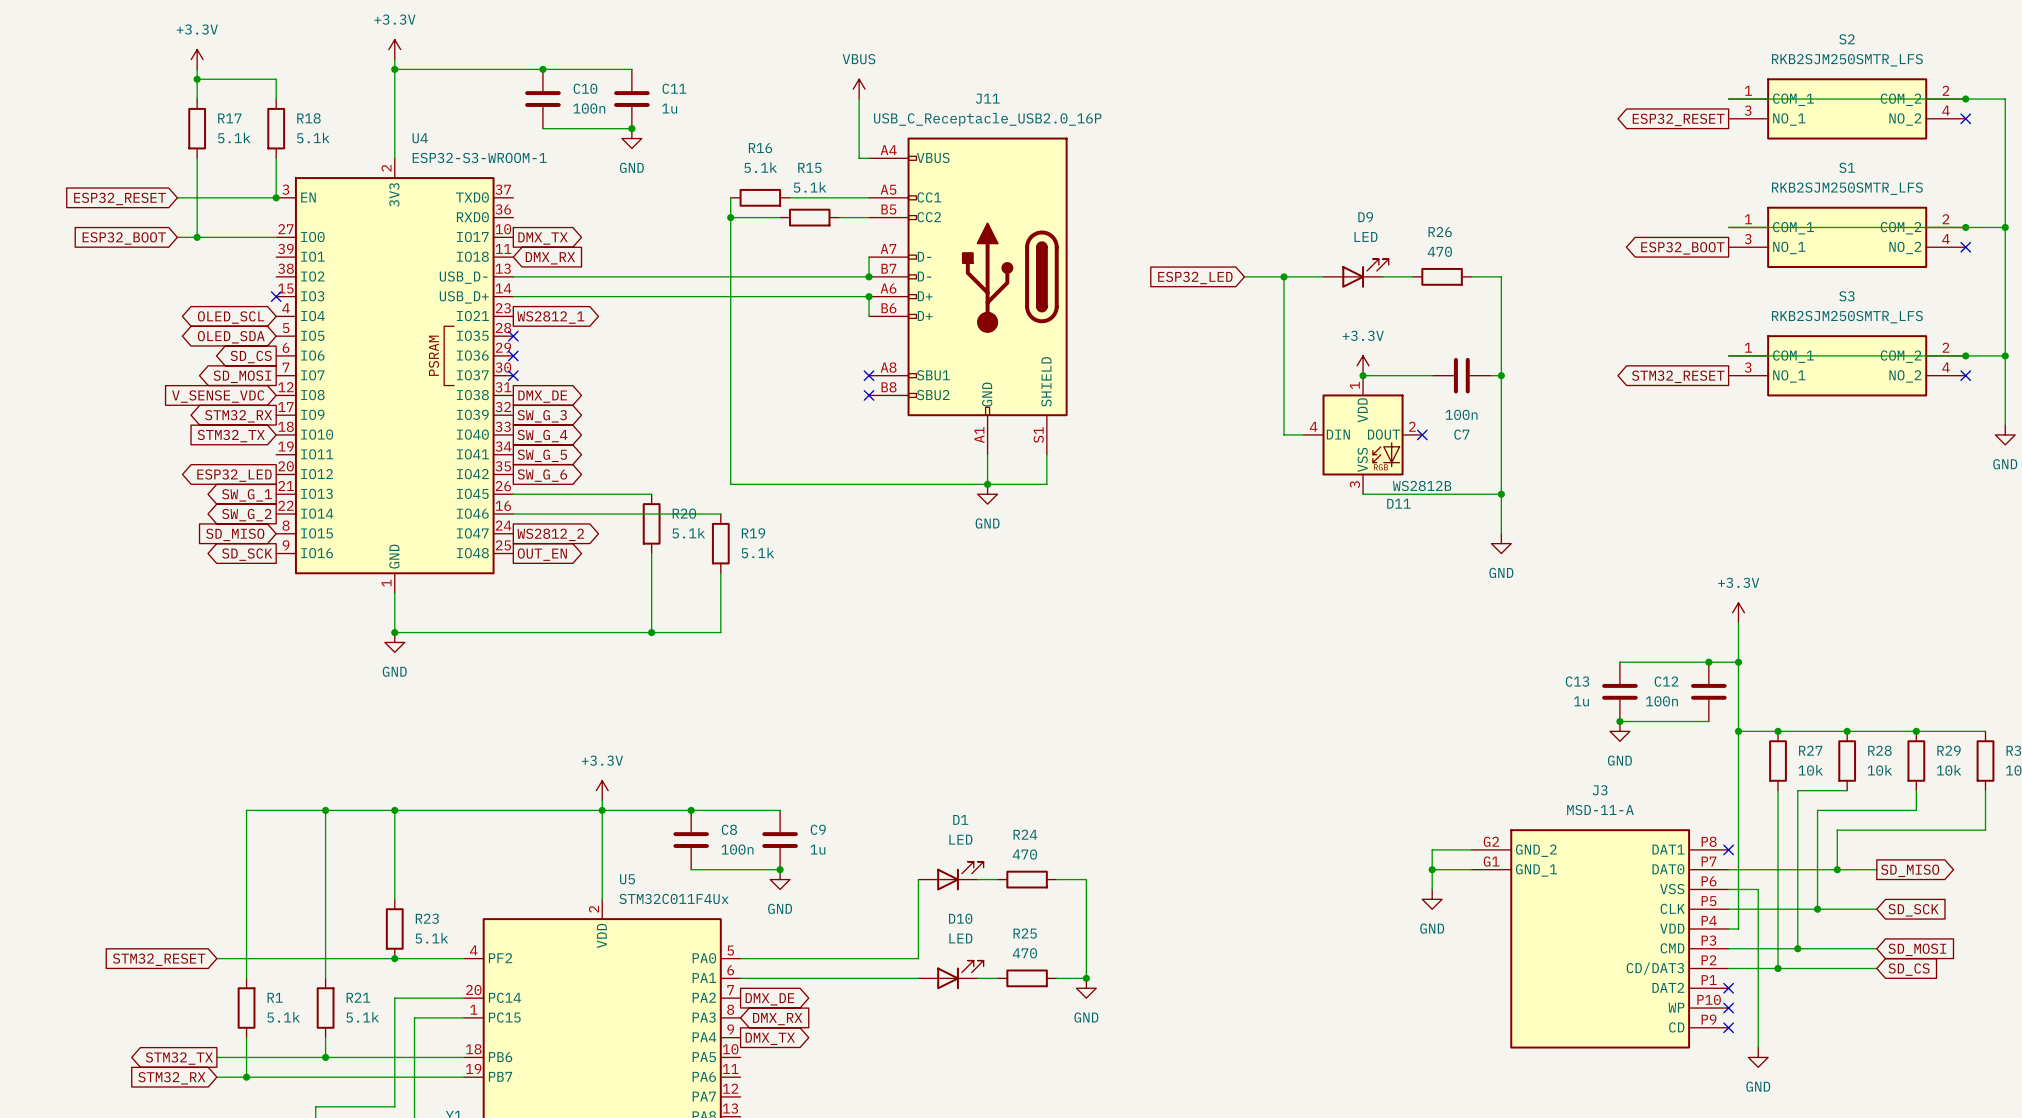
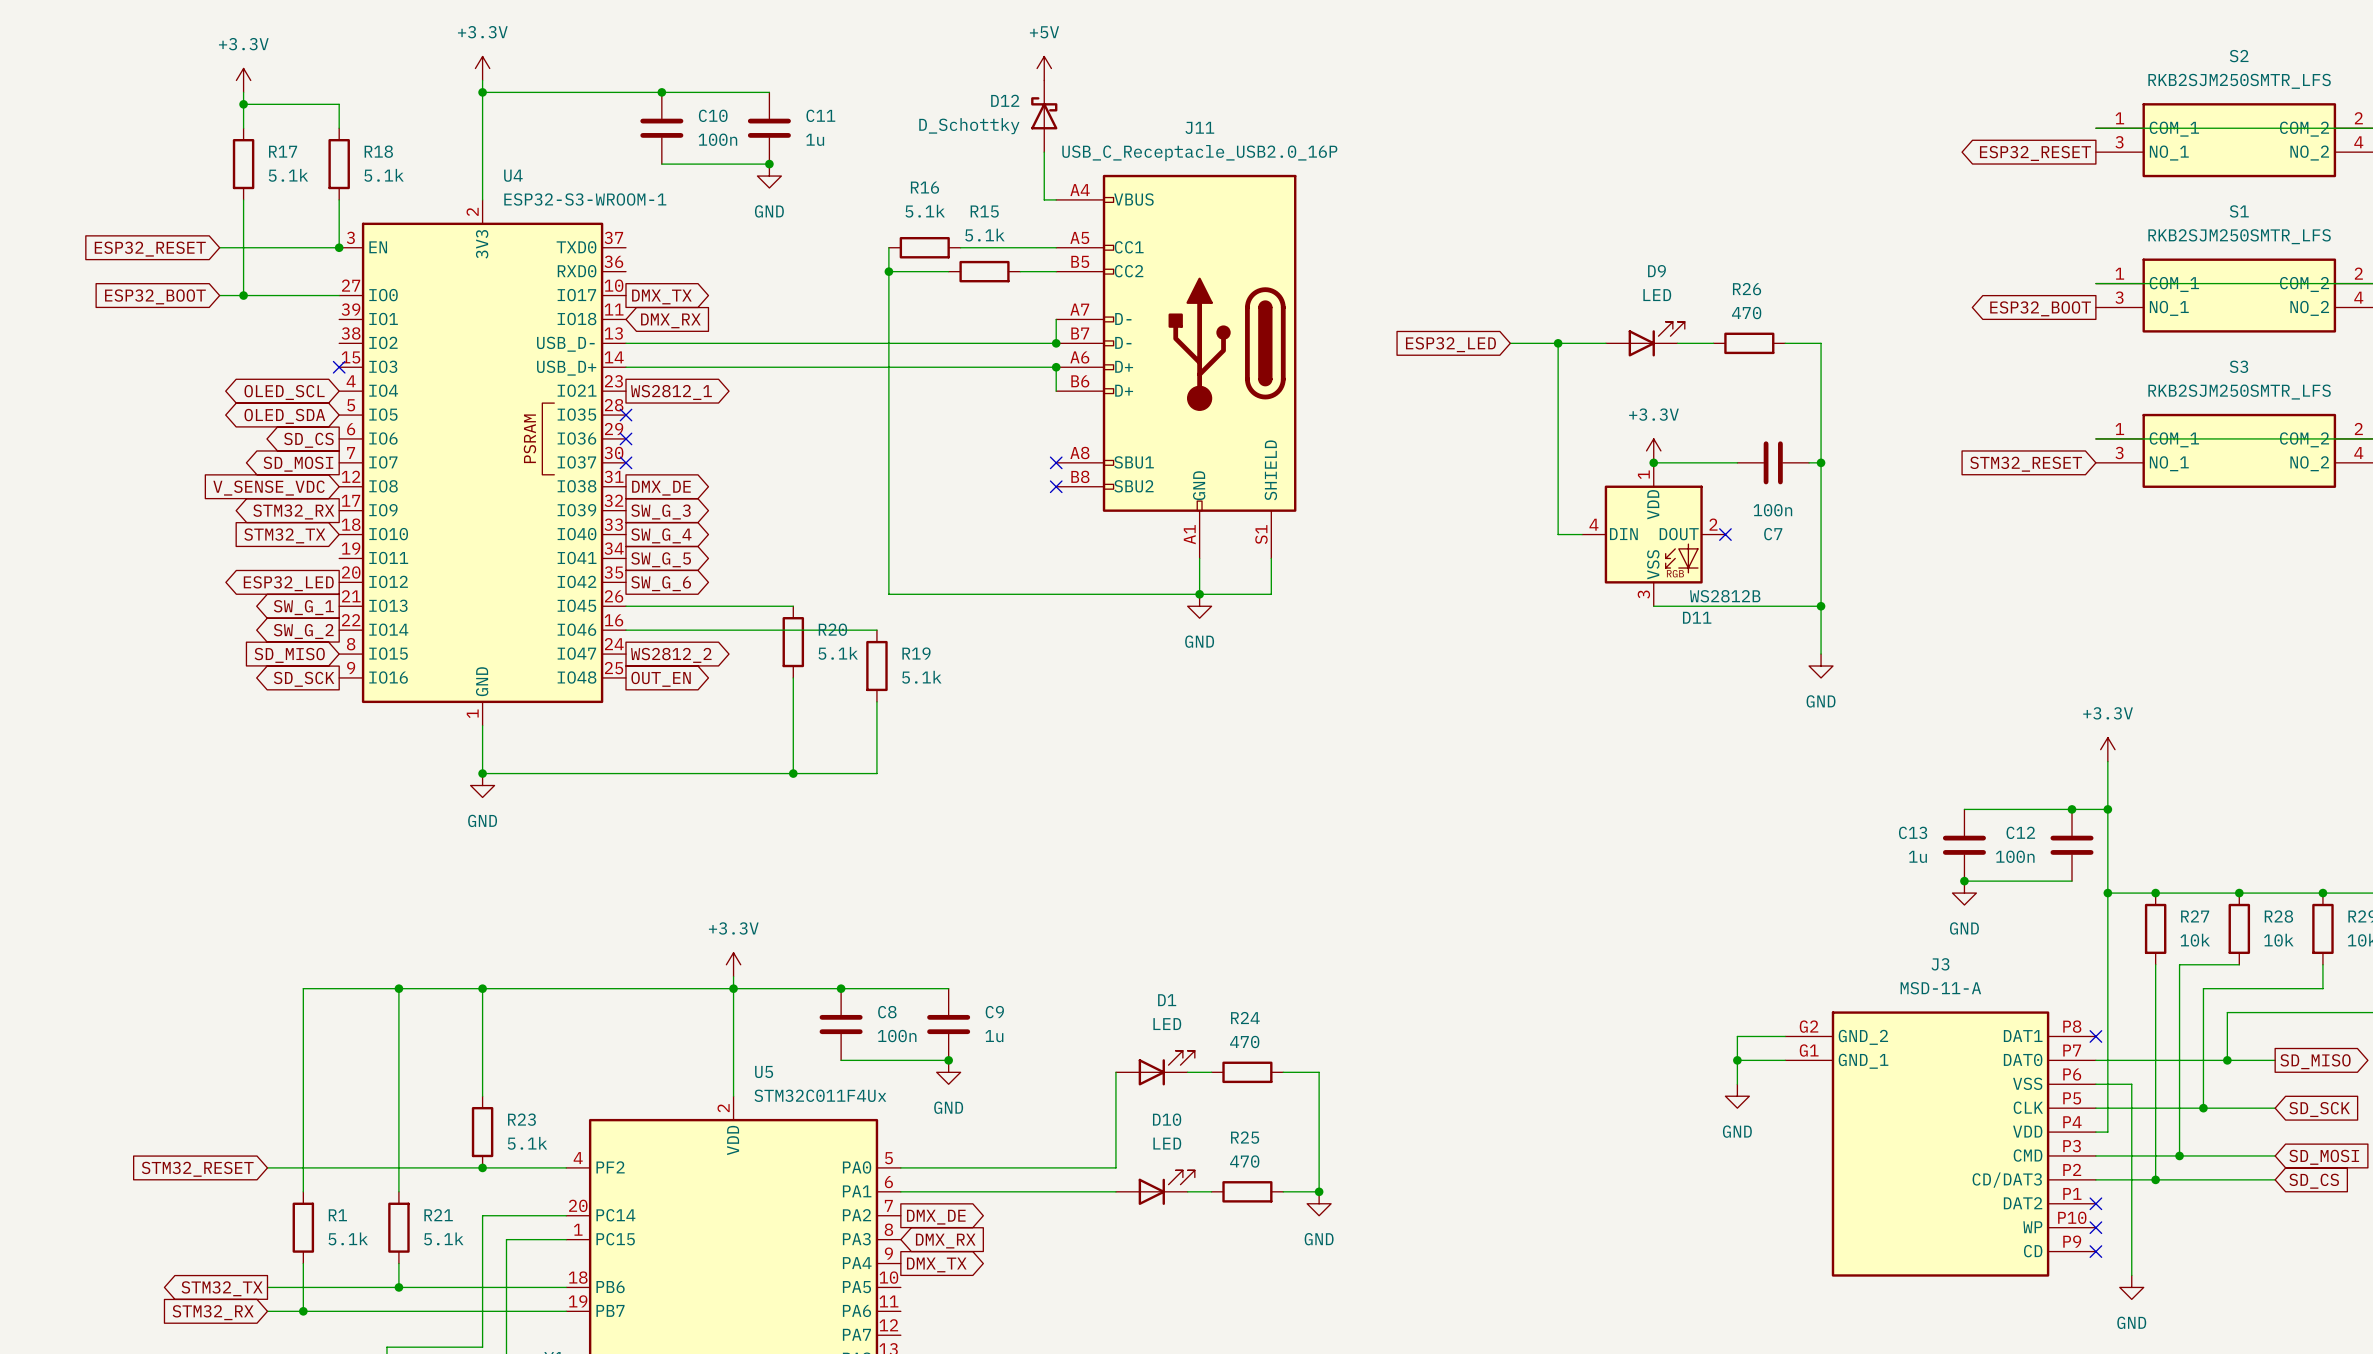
power symbol: none -> +5V (1044, 68)
power symbol: VBUS (859, 89) -> none
D12: none -> D_Schottky (1044, 116)
global label shape: output (1678, 376) -> input (2026, 464)

